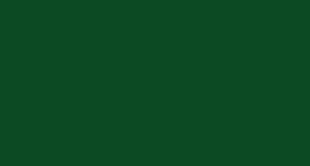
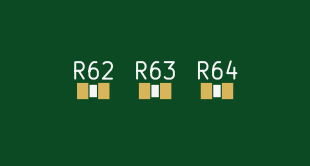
R62: none -> (93, 91)
R63: none -> (155, 91)
R64: none -> (216, 91)

